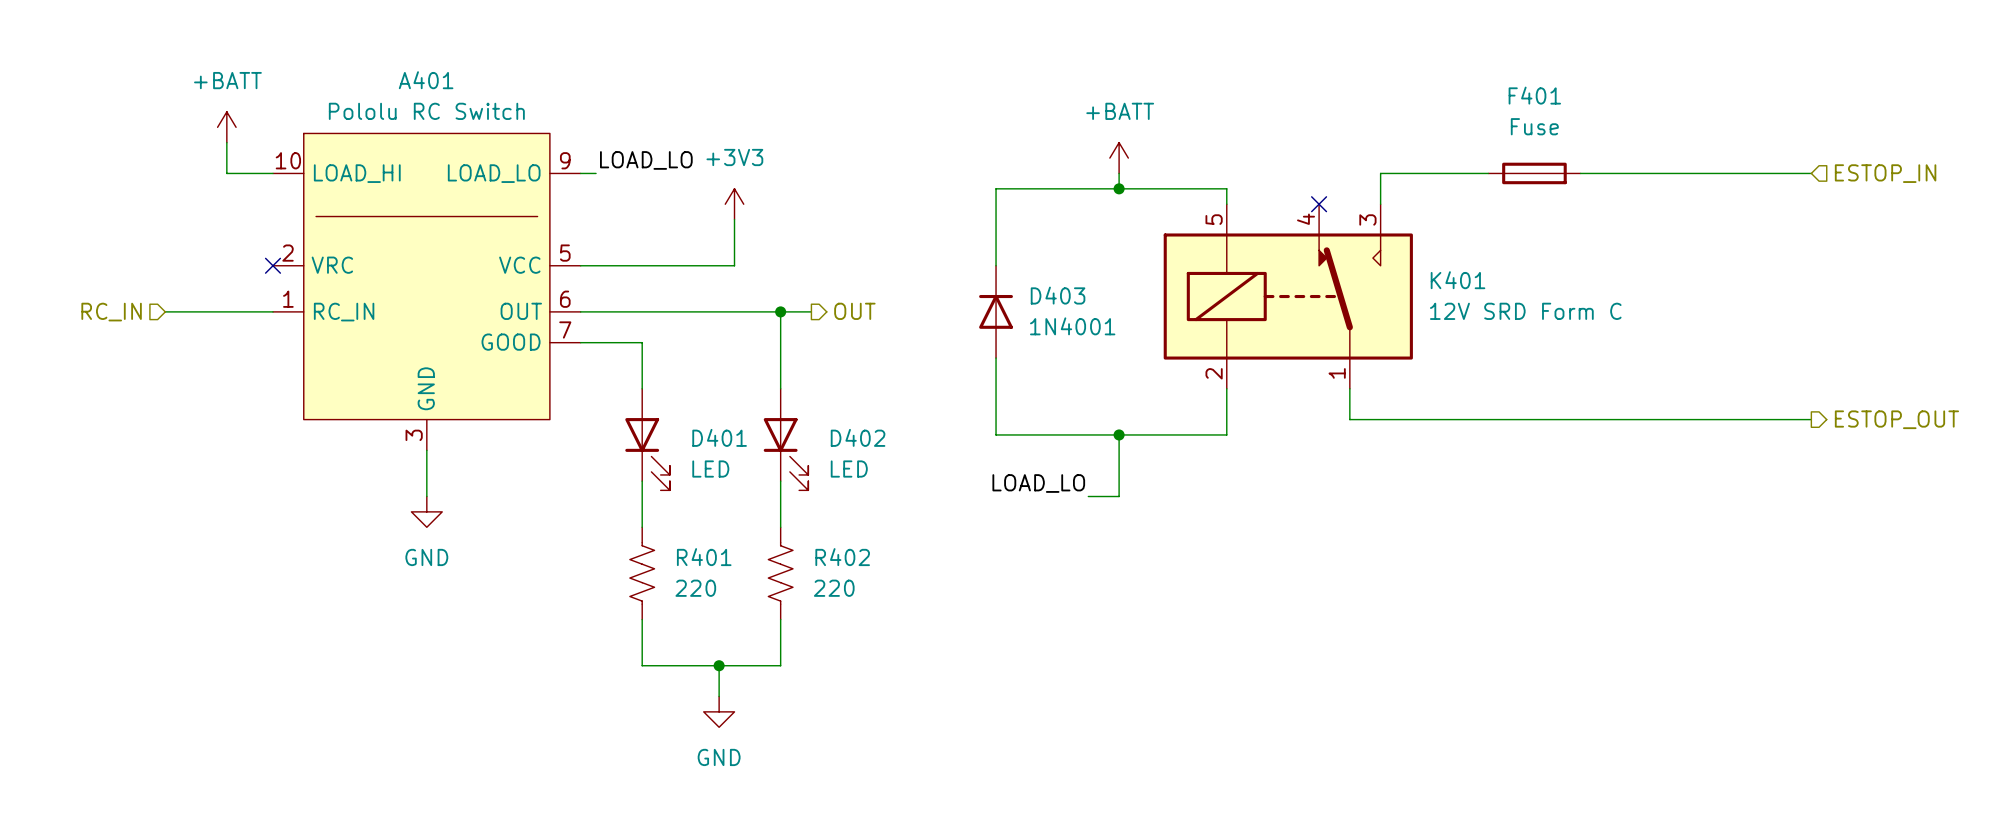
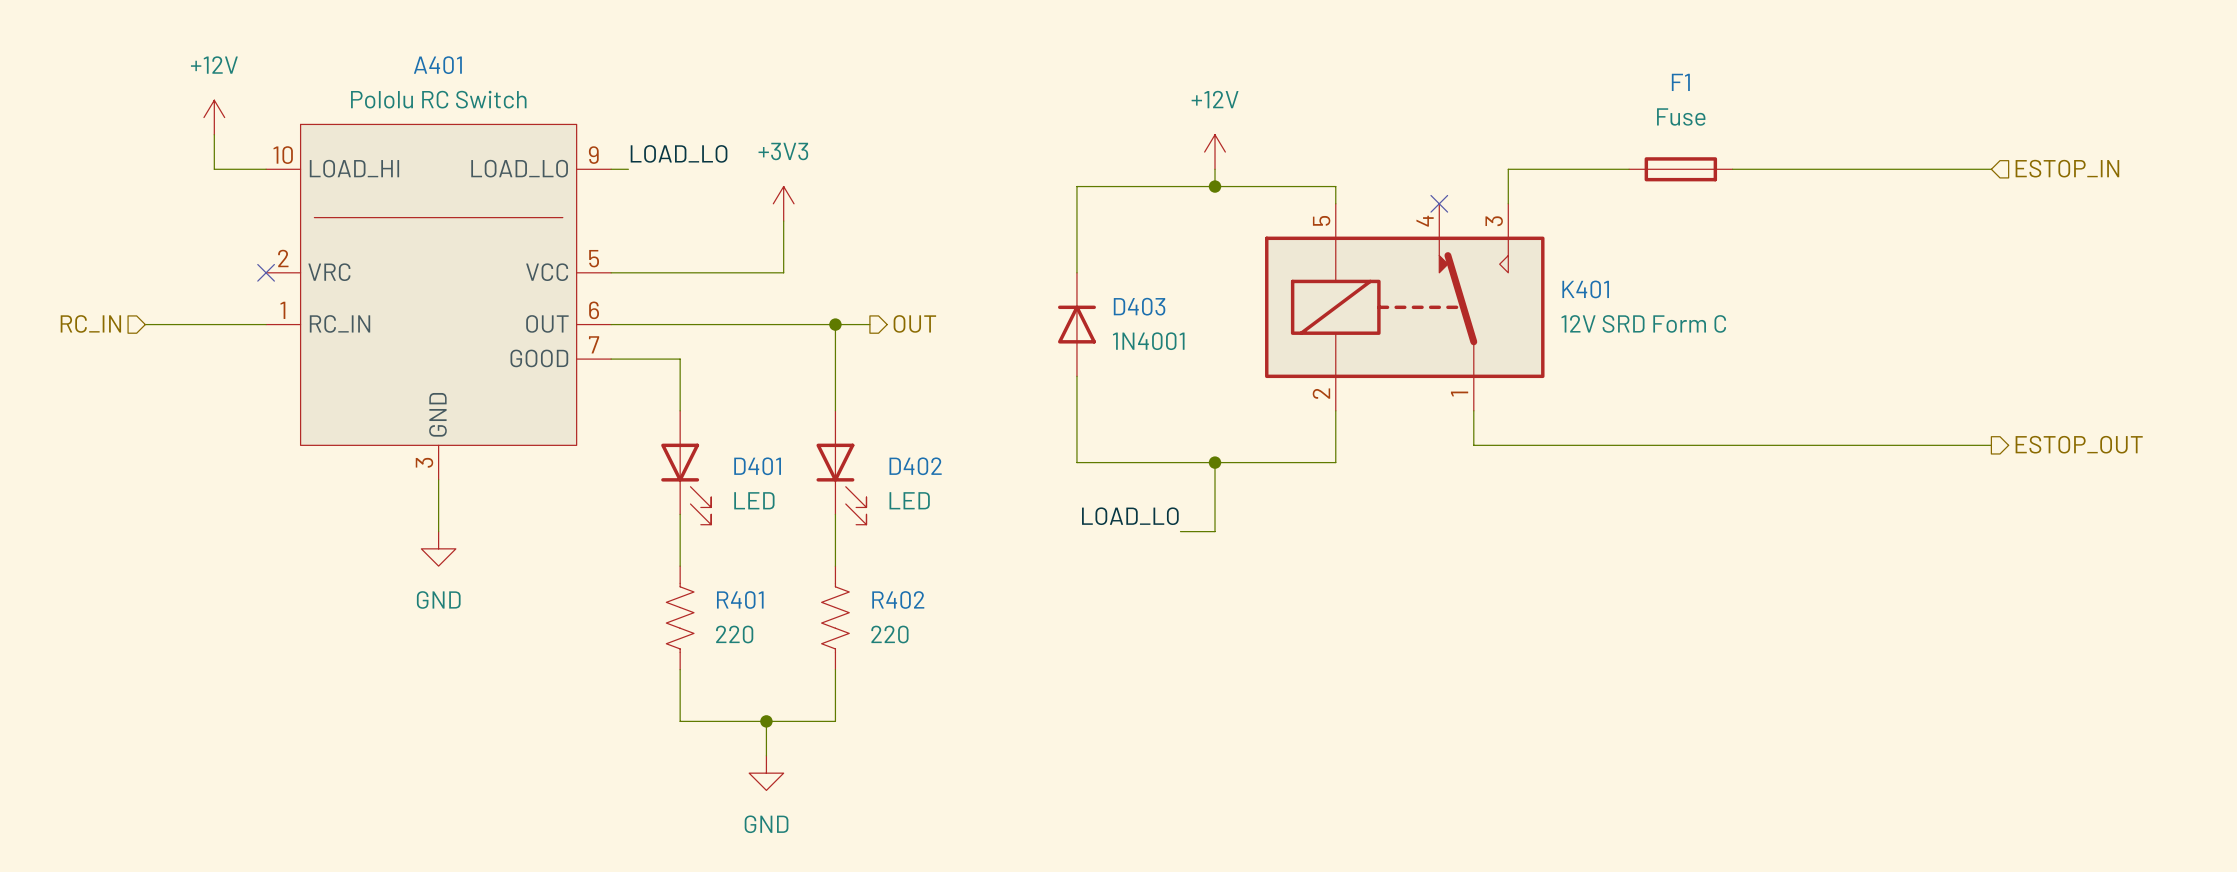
F401 name: F401 (1534, 95) -> F1 (1680, 82)
power symbol: +BATT (226, 127) -> +12V (214, 117)
power symbol: +BATT (1119, 158) -> +12V (1215, 152)

